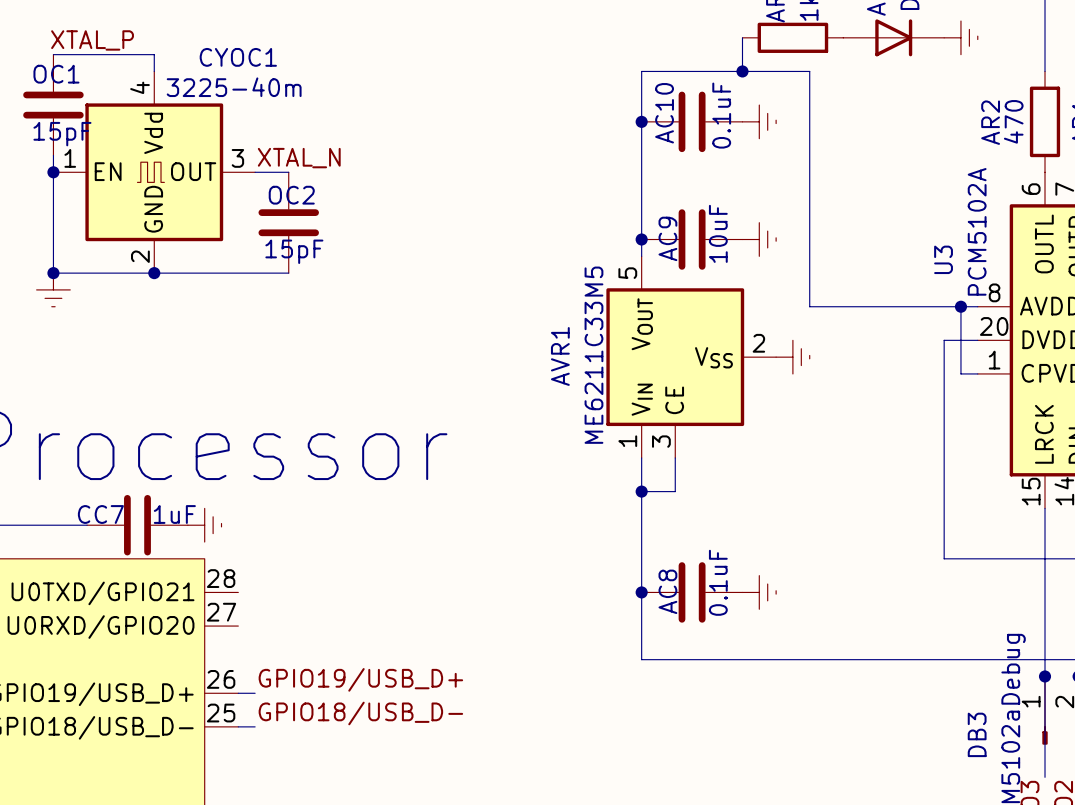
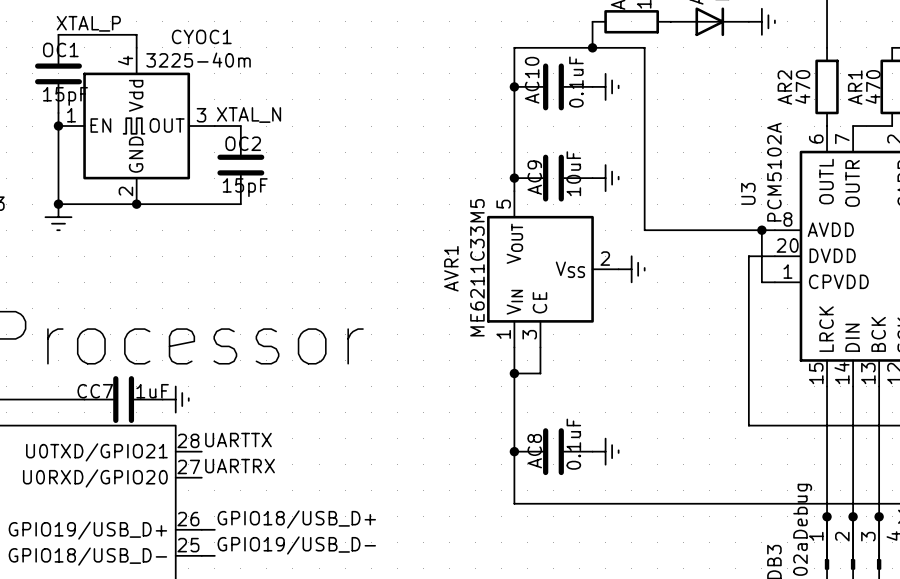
label: none -> UARTTX (238, 440)
label: none -> UARTRX (240, 466)
label: GPIO19/USB_D+ (360, 679) -> GPIO18/USB_D+ (296, 519)
label: GPIO18/USB_D- (360, 713) -> GPIO19/USB_D- (296, 545)

